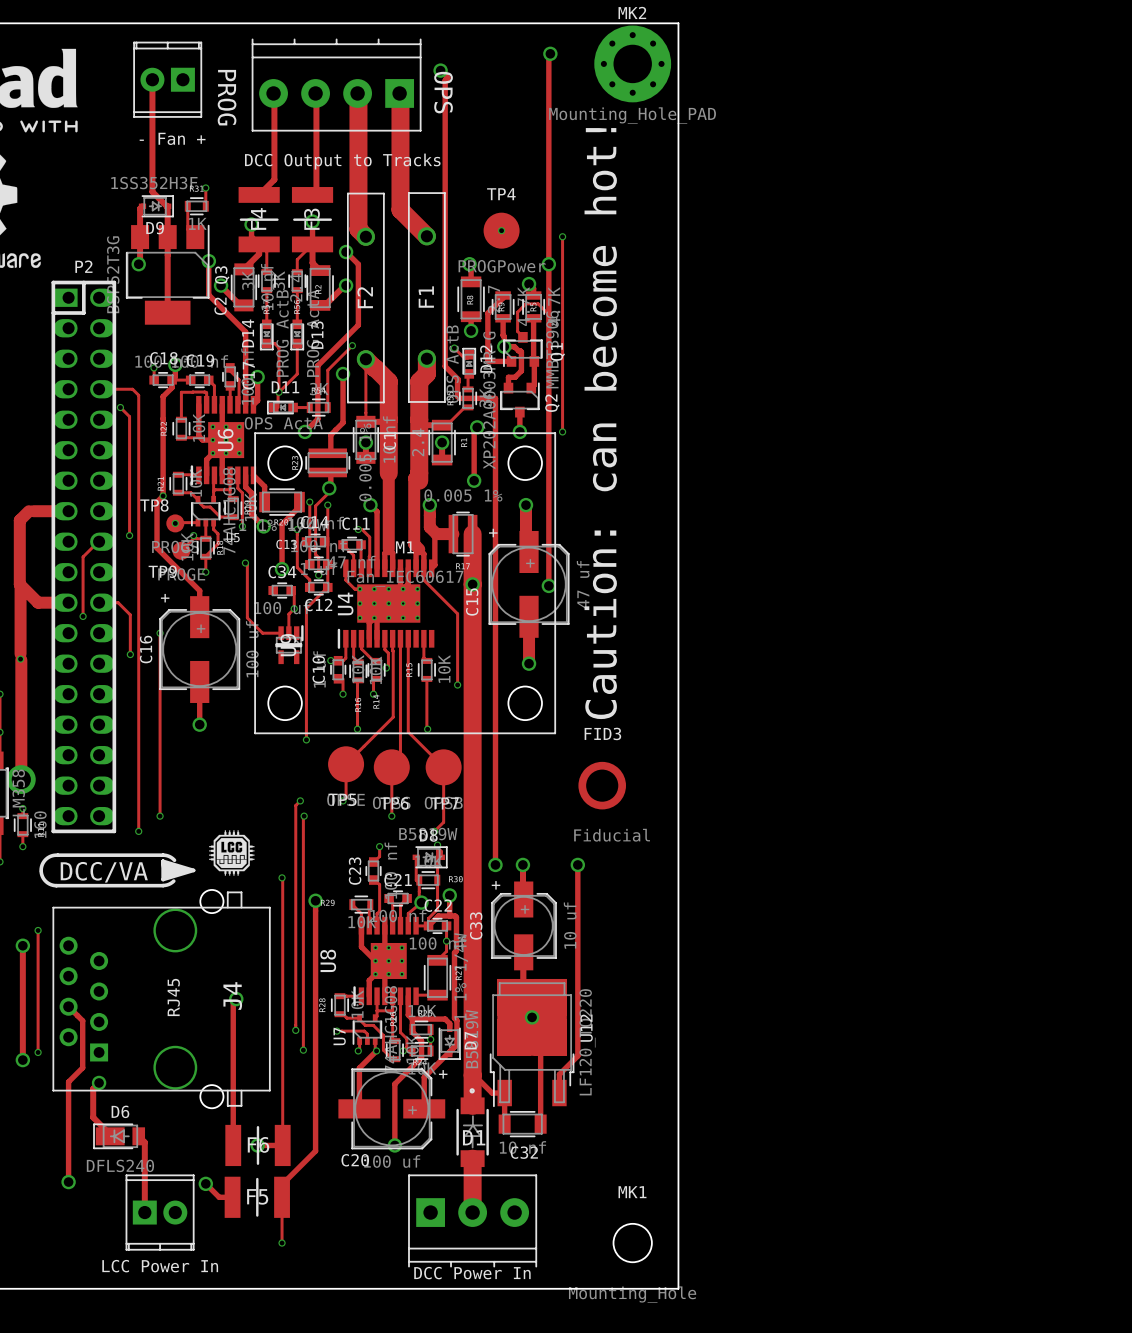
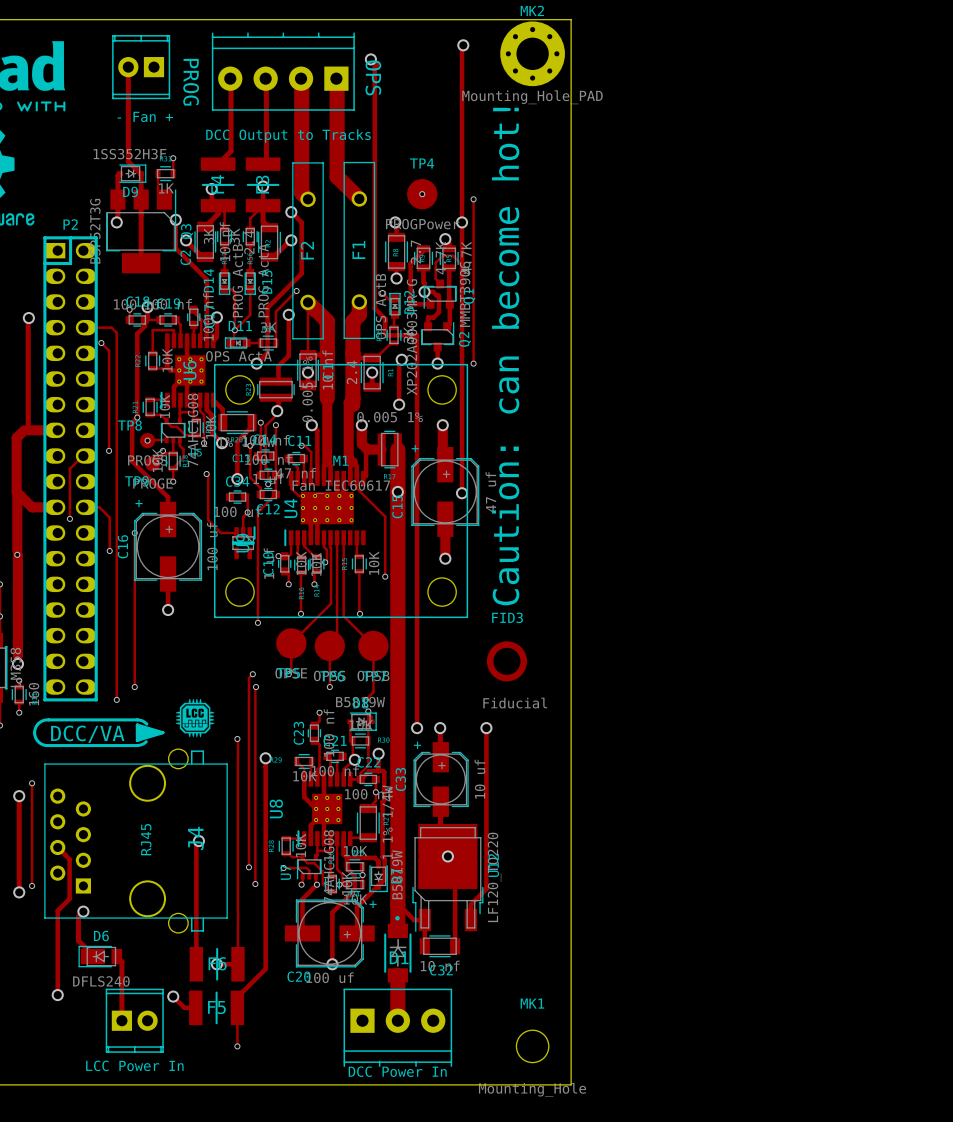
track: none -> (28, 318) (28, 430)
via: none -> (28, 318)
via size: [6, 765, 36, 794] -> [11, 657, 25, 670]

